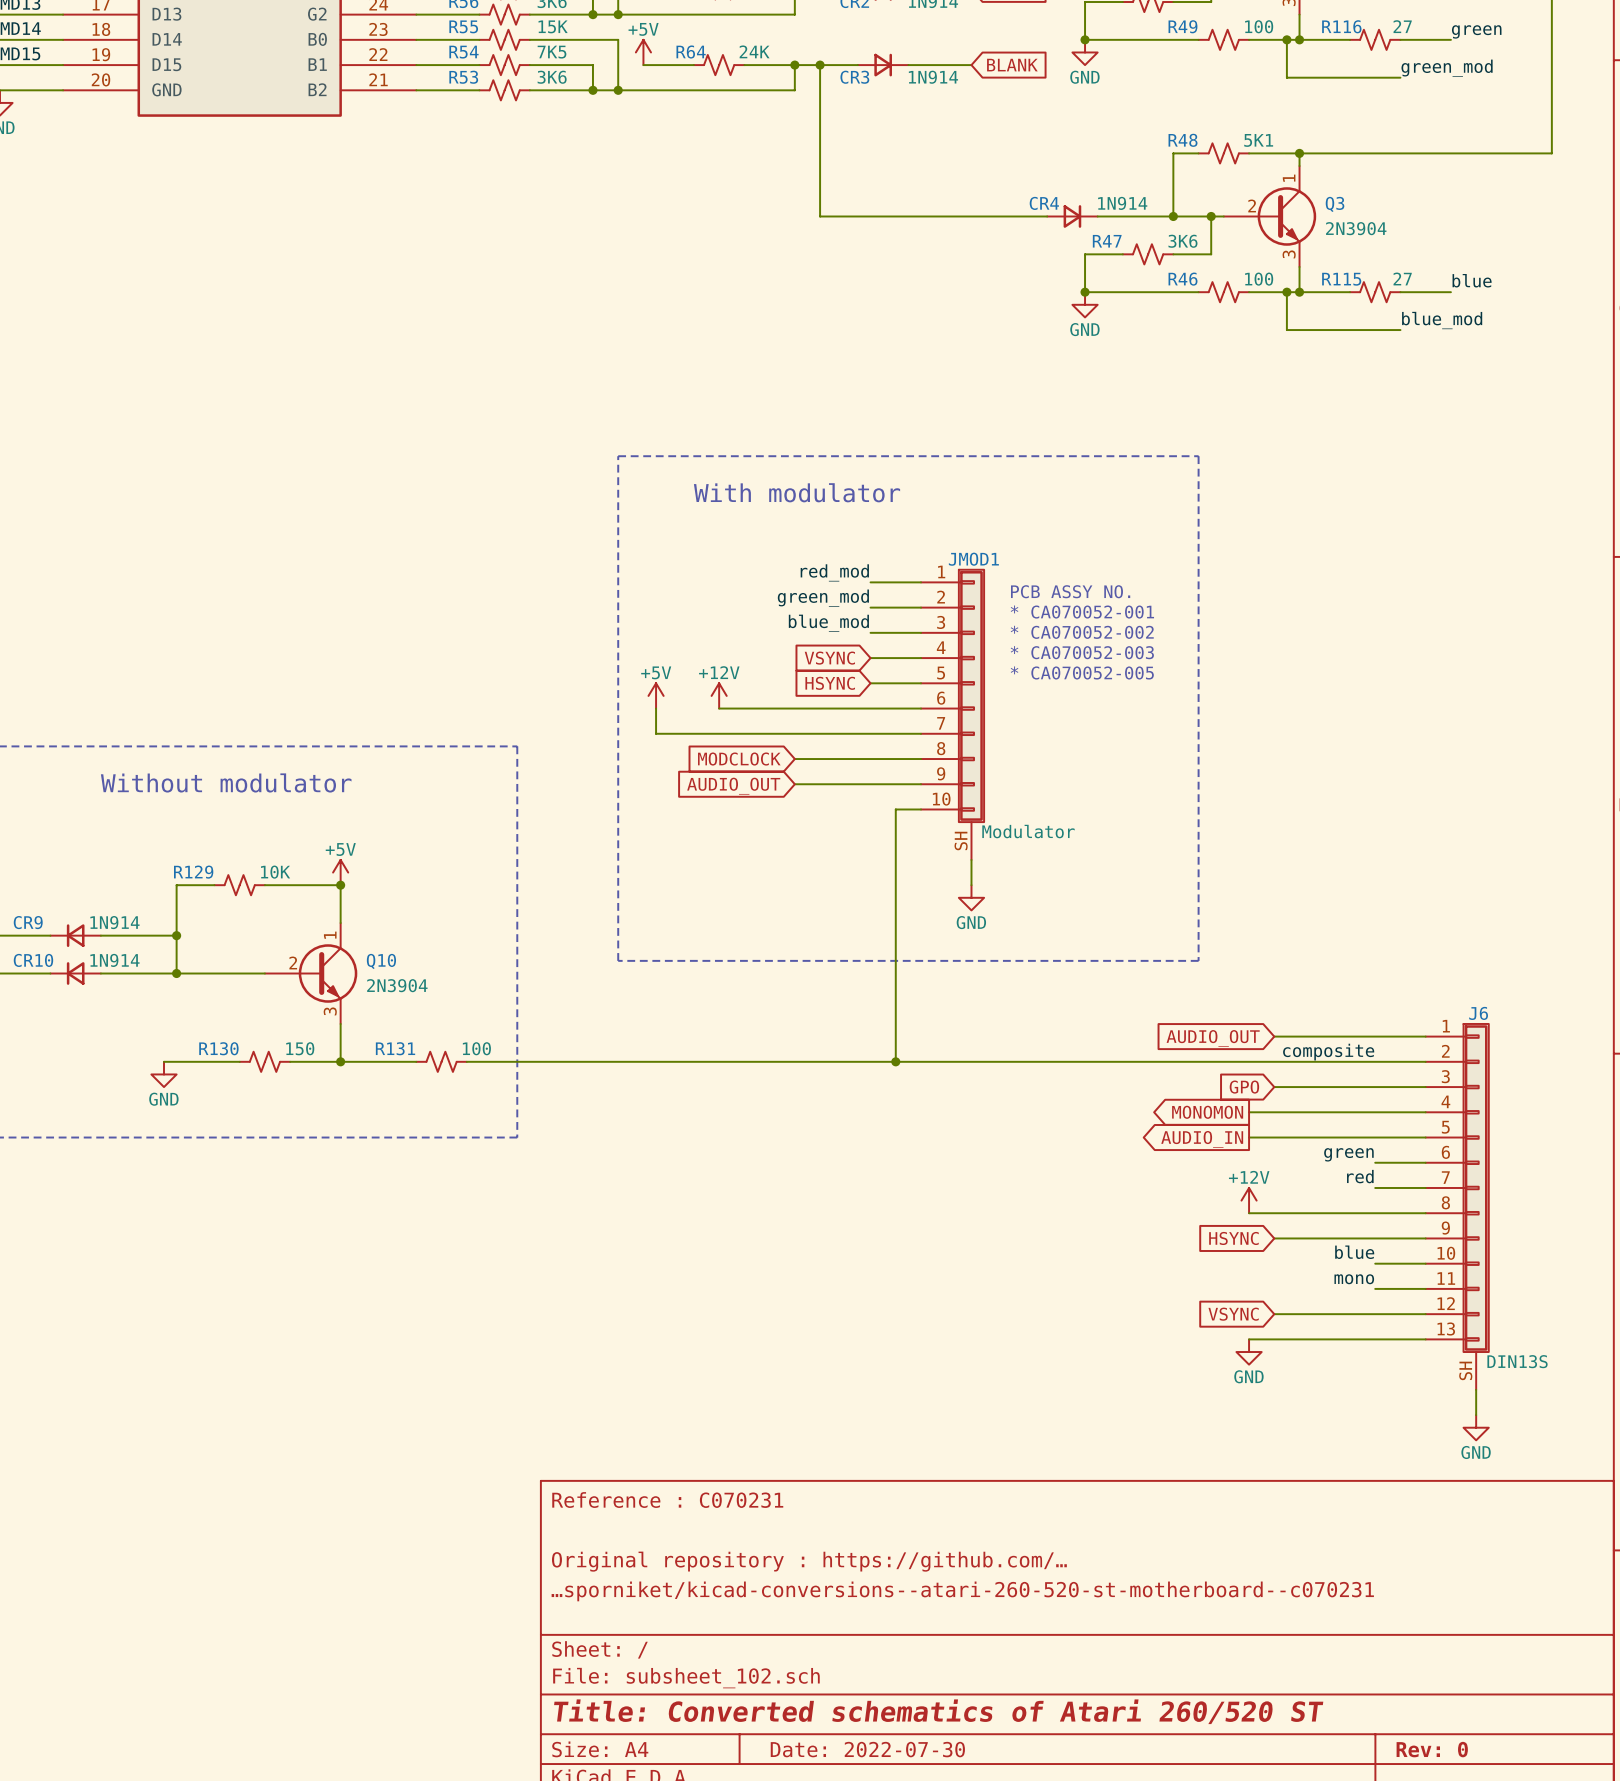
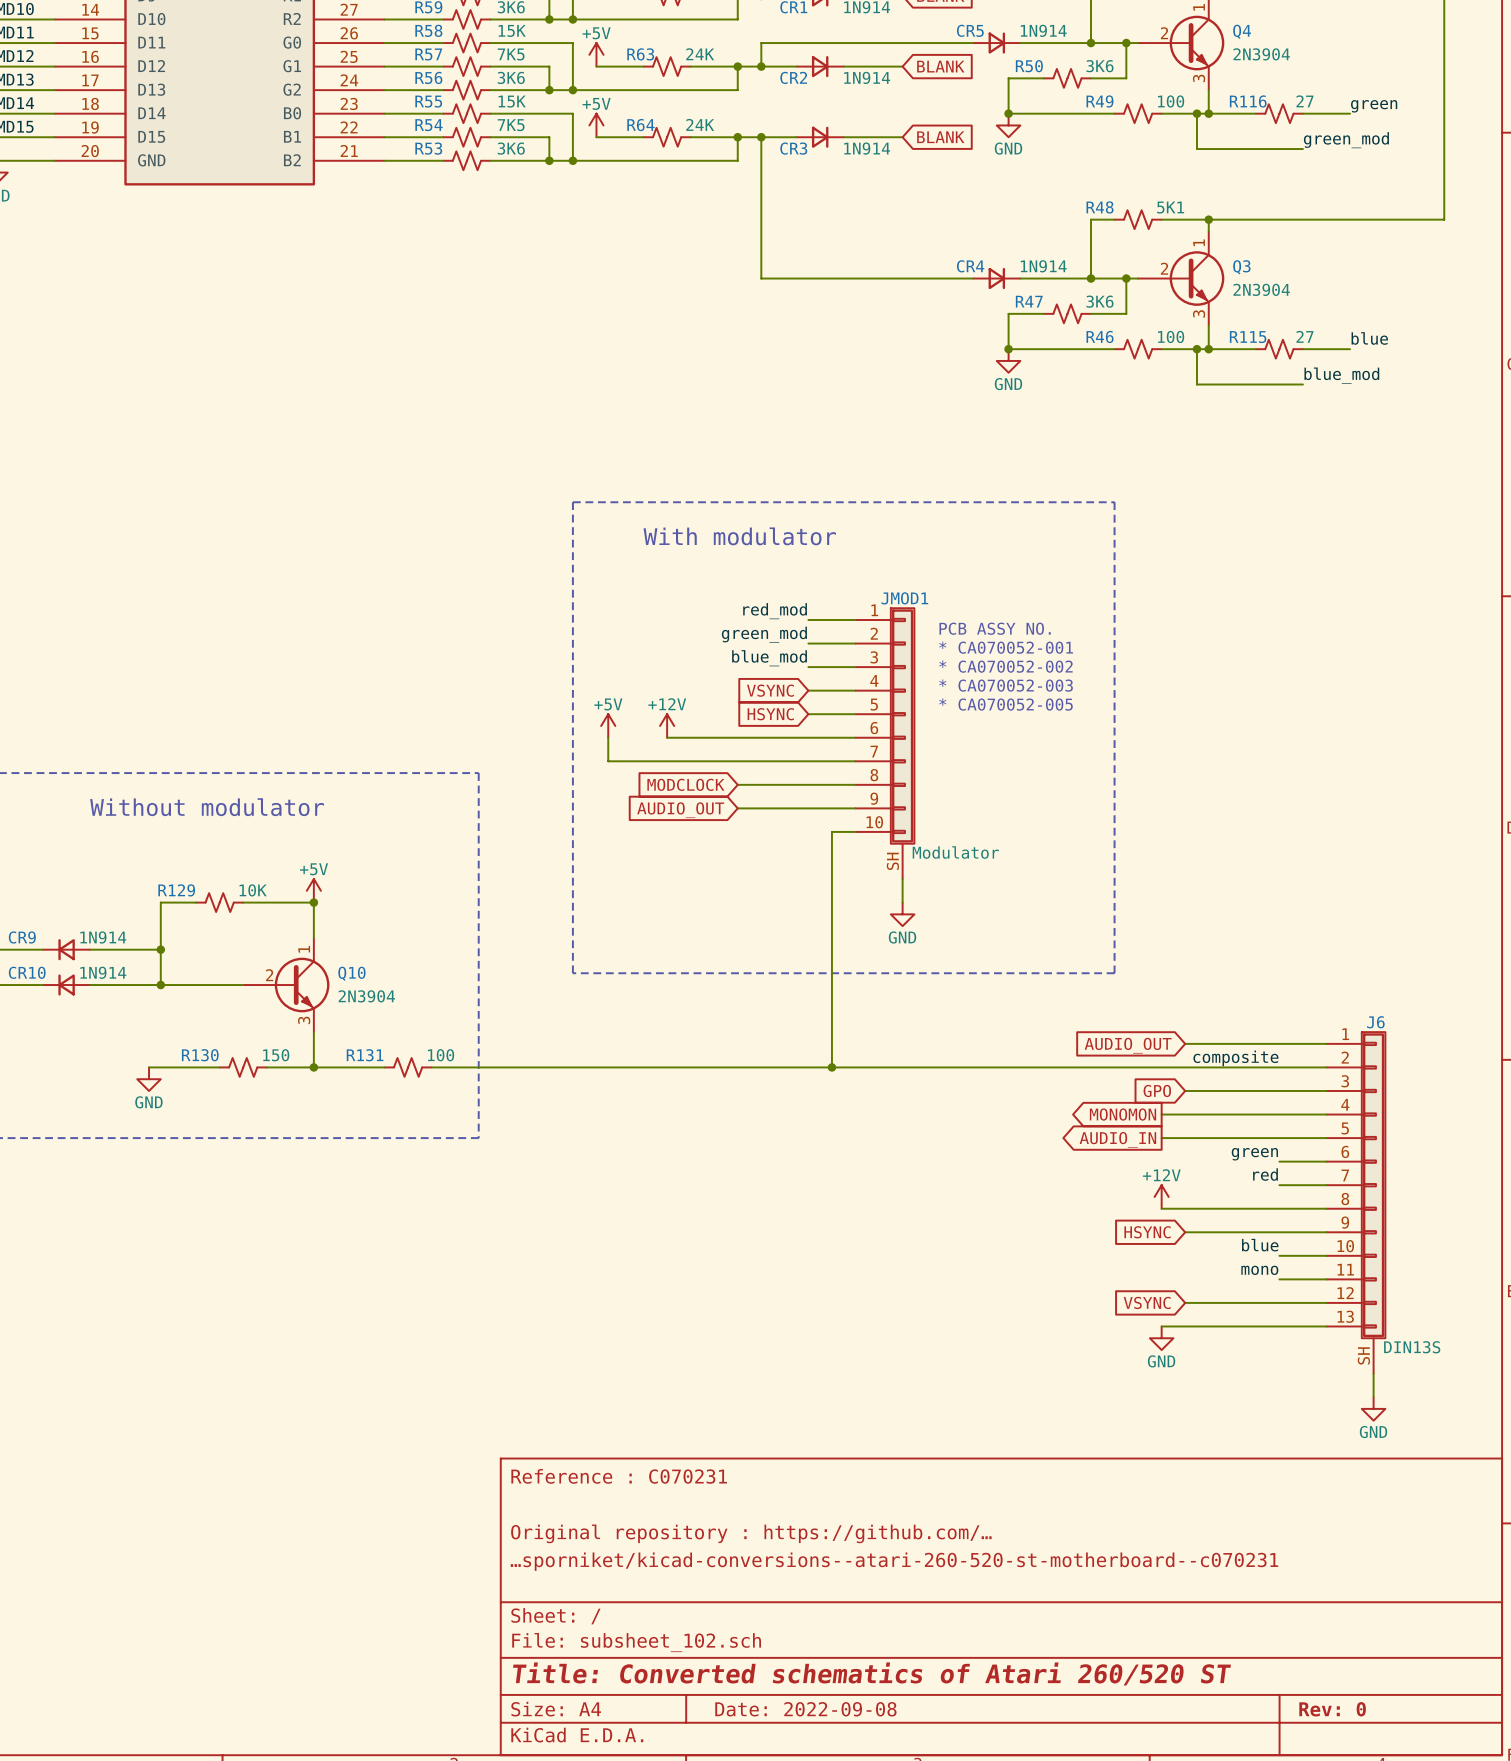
title block: Date: 2022-07-30 (867, 1749) -> Date: 2022-09-08 (805, 1709)

